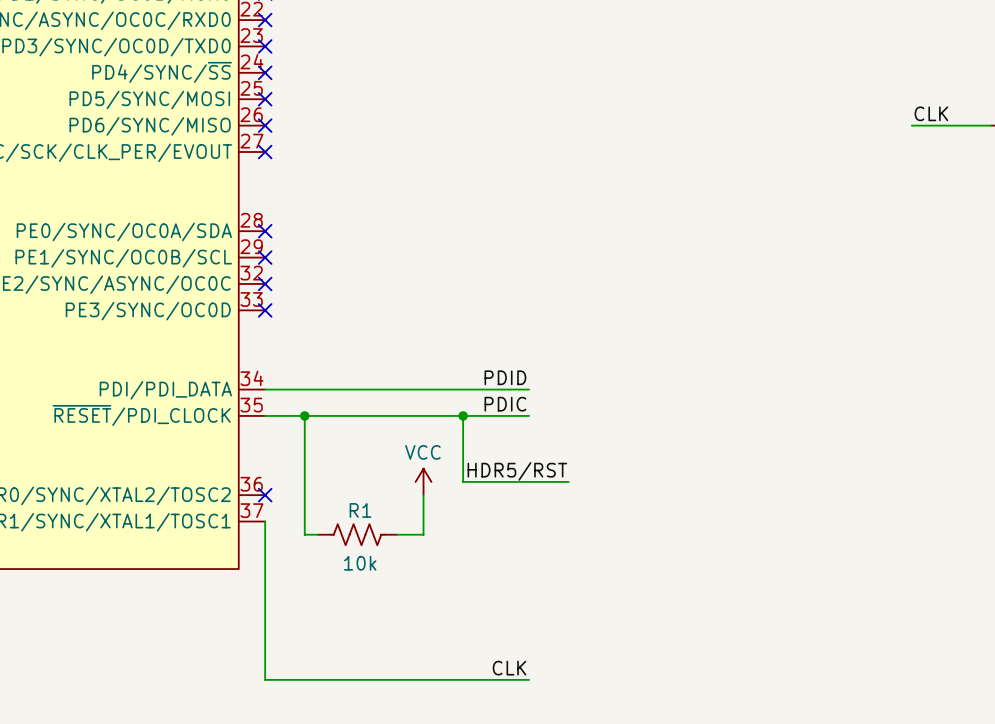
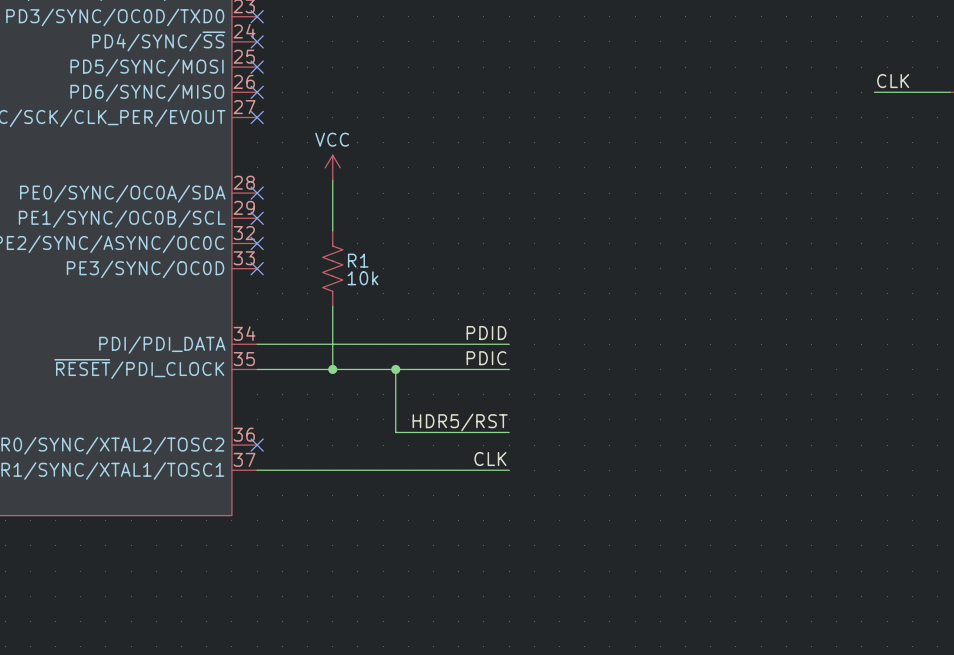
power symbol: none -> VCC (332, 167)
wire: none -> (332, 180) (332, 230)
wire: none -> (332, 306) (332, 369)
wire: (304, 415) (304, 534) (317, 534) -> none
junction position: (304, 415) -> (332, 369)
junction: none -> (395, 369)
wire: (463, 415) (463, 481) -> (395, 369) (395, 432) (446, 432)
junction: (463, 415) -> none
label position: HDR5/RST (517, 471) -> HDR5/RST (460, 422)
power symbol: VCC (423, 481) -> none
wire: (529, 481) (568, 481) -> none
wire: (423, 495) (423, 534) (397, 534) -> none
wire: (265, 521) (265, 679) (529, 679) -> (257, 470) (509, 470)
R1 rotation: 0° (357, 534) -> 90° clockwise (332, 268)
R1 position: (357, 534) -> (332, 268)
R1 text position: 10k (360, 563) -> 10k (362, 278)
label position: CLK (509, 668) -> CLK (490, 459)

